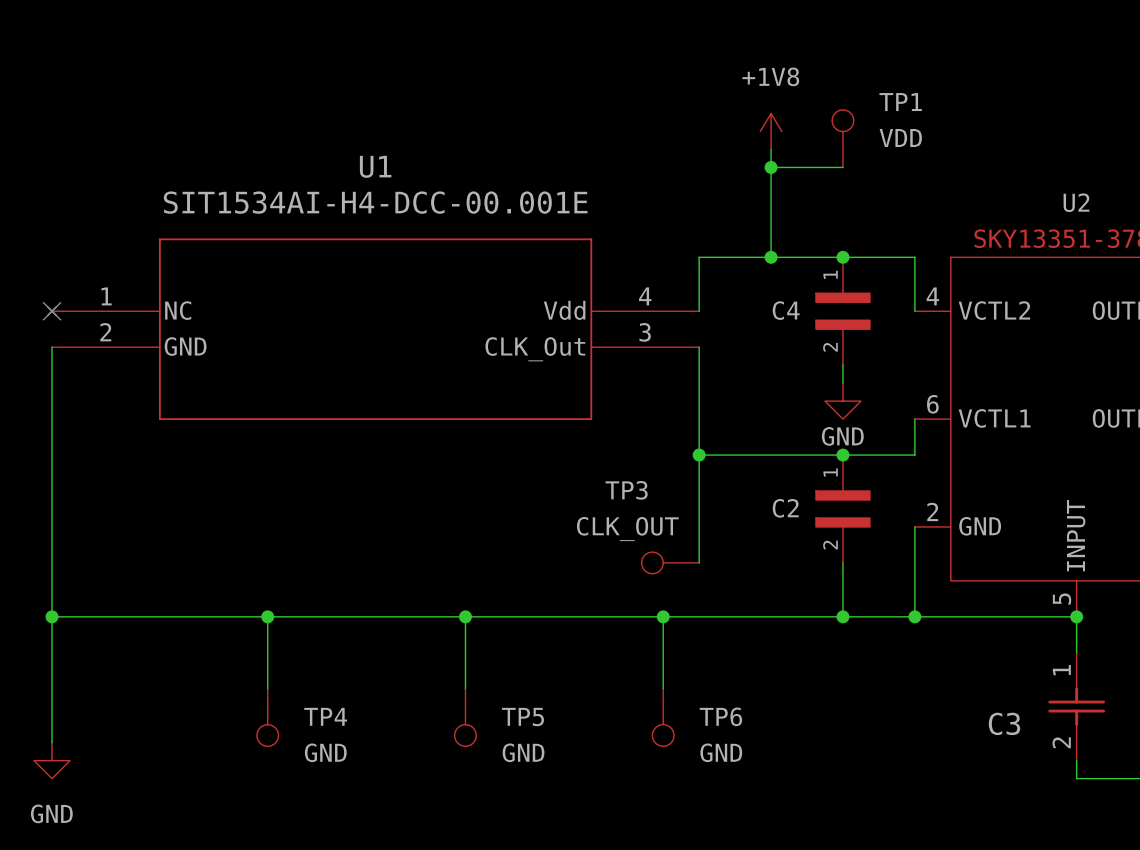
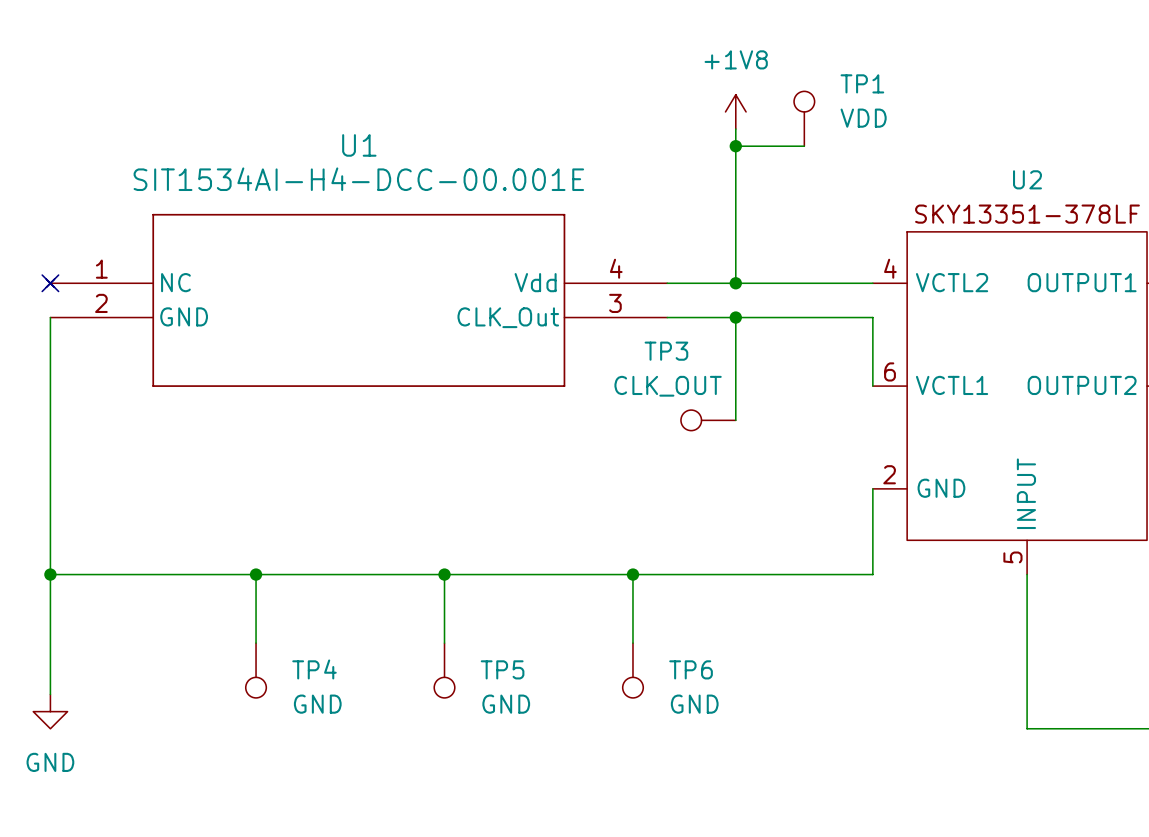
junction: (771, 257) -> none
junction: (842, 257) -> none
wire: (699, 311) (699, 257) (914, 257) (914, 311) -> (667, 283) (872, 283)
junction: none -> (735, 283)
C4: (842, 311) -> none
wire: (699, 347) (699, 562) -> none
wire: none -> (735, 317) (735, 420)
junction: none -> (735, 317)
wire: (842, 365) (842, 383) -> none
power symbol: GND (842, 401) -> none
wire: (914, 419) (914, 455) (699, 455) -> (872, 386) (872, 317) (667, 317)
junction: (699, 455) -> none
junction: (842, 455) -> none
C2: (842, 508) -> none
TP3 position: (670, 562) -> (708, 420)
wire: (842, 562) (842, 616) -> (735, 231) (735, 283)
junction: (842, 616) -> none
wire: (914, 616) (1076, 616) -> none
junction: (914, 616) -> none
junction: (1076, 616) -> none
C3: (1076, 706) -> none

